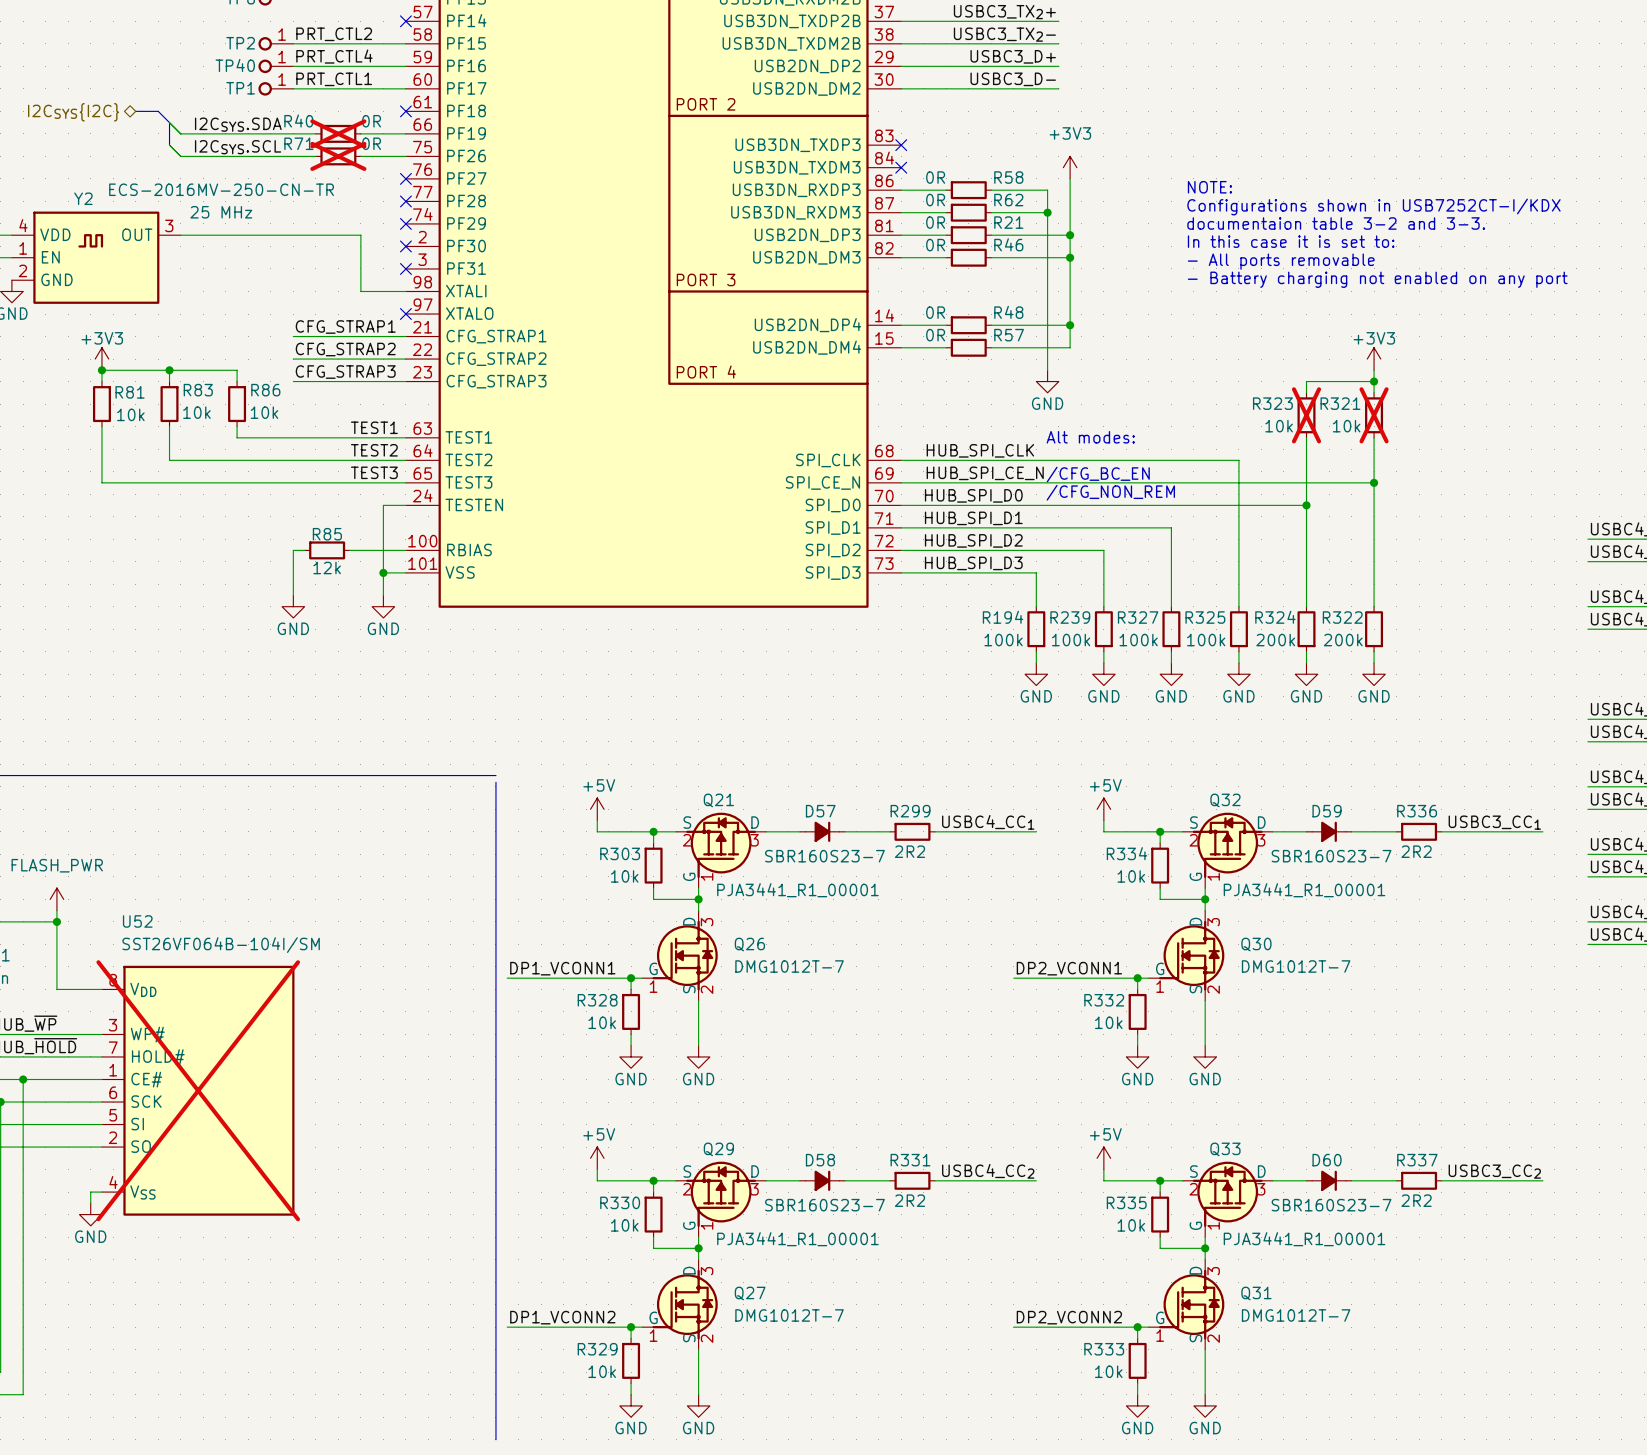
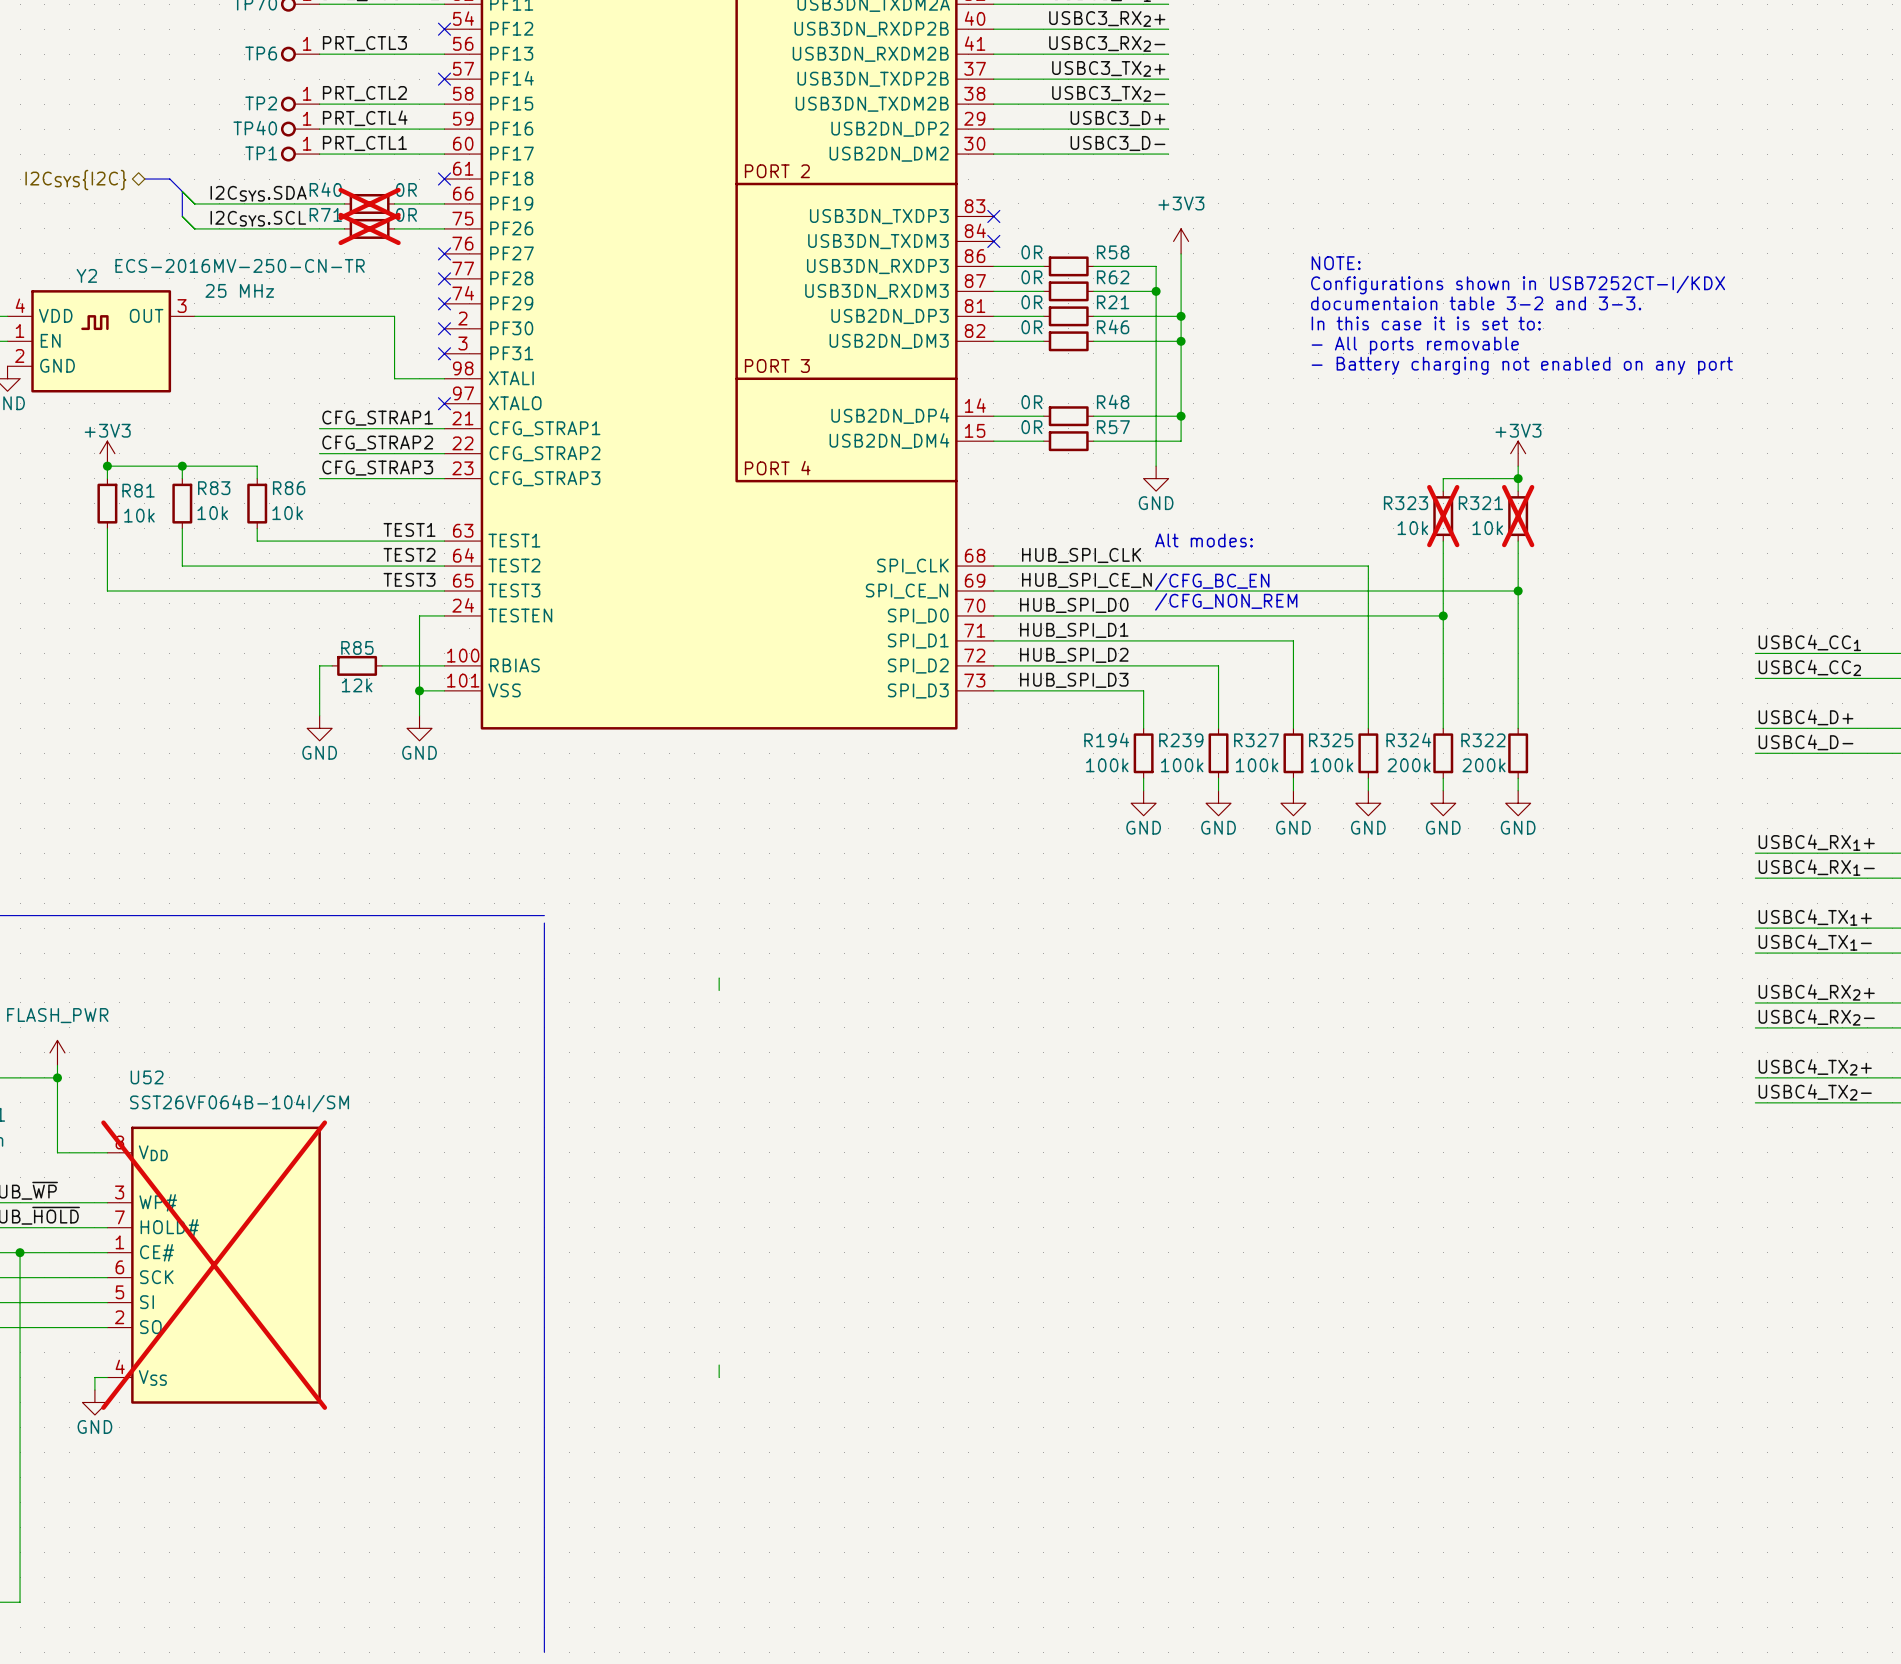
power symbol: +5V (597, 809) -> none
power symbol: +5V (1103, 809) -> none
wire: (597, 820) (597, 831) (676, 831) -> none
wire: (1103, 820) (1103, 831) (1182, 831) -> none
label: USBC4_CC1 (988, 822) -> none
label: USBC3_CC1 (1494, 822) -> none
junction: (653, 831) -> none
wire: (766, 831) (799, 831) -> none
D57: (822, 831) -> none
wire: (844, 831) (889, 831) -> none
R299: (912, 831) -> none
wire: (935, 831) (1036, 831) -> none
wire: (1160, 831) (1160, 843) -> none
junction: (1160, 831) -> none
wire: (1272, 831) (1306, 831) -> none
D59: (1329, 831) -> none
wire: (1351, 831) (1396, 831) -> none
R336: (1419, 831) -> none
wire: (1441, 831) (1542, 831) -> none
Q21: (721, 850) -> none
Q32: (1227, 850) -> none
R303: (653, 865) -> none
R334: (1160, 865) -> none
wire: (653, 888) (653, 899) (698, 899) -> none
wire: (698, 888) (698, 910) -> none
wire: (1160, 888) (1160, 899) (1205, 899) -> none
wire: (1205, 888) (1205, 910) -> none
junction: (698, 899) -> none
junction: (1205, 899) -> none
Q26: (680, 955) -> none
Q30: (1186, 955) -> none
label: DP1_VCONN1 (562, 968) -> none
label: DP2_VCONN1 (1069, 968) -> none
wire: (507, 978) (642, 978) -> none
wire: (631, 978) (631, 989) -> none
junction: (631, 978) -> none
wire: (1013, 978) (1148, 978) -> none
wire: (1137, 978) (1137, 989) -> none
junction: (1137, 978) -> none
wire: (698, 1000) (698, 1045) -> none
wire: (1205, 1000) (1205, 1045) -> none
R328: (631, 1011) -> none
R332: (1137, 1011) -> none
wire: (631, 1034) (631, 1045) -> none
wire: (1137, 1034) (1137, 1045) -> none
power symbol: GND (631, 1056) -> none
power symbol: GND (698, 1056) -> none
power symbol: GND (1137, 1056) -> none
power symbol: GND (1205, 1056) -> none
power symbol: +5V (597, 1158) -> none
power symbol: +5V (1103, 1158) -> none
wire: (597, 1169) (597, 1180) (676, 1180) -> none
wire: (1103, 1169) (1103, 1180) (1182, 1180) -> none
label: USBC4_CC2 (988, 1171) -> none
label: USBC3_CC2 (1494, 1171) -> none
junction: (653, 1180) -> none
wire: (766, 1180) (799, 1180) -> none
D58: (822, 1180) -> none
wire: (844, 1180) (889, 1180) -> none
R331: (912, 1180) -> none
wire: (935, 1180) (1036, 1180) -> none
wire: (1160, 1180) (1160, 1192) -> none
junction: (1160, 1180) -> none
wire: (1272, 1180) (1306, 1180) -> none
D60: (1329, 1180) -> none
wire: (1351, 1180) (1396, 1180) -> none
R337: (1419, 1180) -> none
wire: (1441, 1180) (1542, 1180) -> none
Q29: (721, 1199) -> none
Q33: (1227, 1199) -> none
R330: (653, 1214) -> none
R335: (1160, 1214) -> none
wire: (653, 1237) (653, 1248) (698, 1248) -> none
wire: (698, 1237) (698, 1259) -> none
wire: (1160, 1237) (1160, 1248) (1205, 1248) -> none
wire: (1205, 1237) (1205, 1259) -> none
junction: (698, 1248) -> none
junction: (1205, 1248) -> none
Q27: (680, 1304) -> none
Q31: (1186, 1304) -> none
label: DP1_VCONN2 (562, 1317) -> none
label: DP2_VCONN2 (1069, 1317) -> none
wire: (507, 1327) (642, 1327) -> none
wire: (631, 1327) (631, 1338) -> none
junction: (631, 1327) -> none
wire: (1013, 1327) (1148, 1327) -> none
wire: (1137, 1327) (1137, 1338) -> none
junction: (1137, 1327) -> none
wire: (698, 1349) (698, 1394) -> none
wire: (1205, 1349) (1205, 1394) -> none
R329: (631, 1360) -> none
R333: (1137, 1360) -> none
wire: (631, 1383) (631, 1394) -> none
wire: (1137, 1383) (1137, 1394) -> none
power symbol: GND (631, 1405) -> none
power symbol: GND (698, 1405) -> none
power symbol: GND (1137, 1405) -> none
power symbol: GND (1205, 1405) -> none

